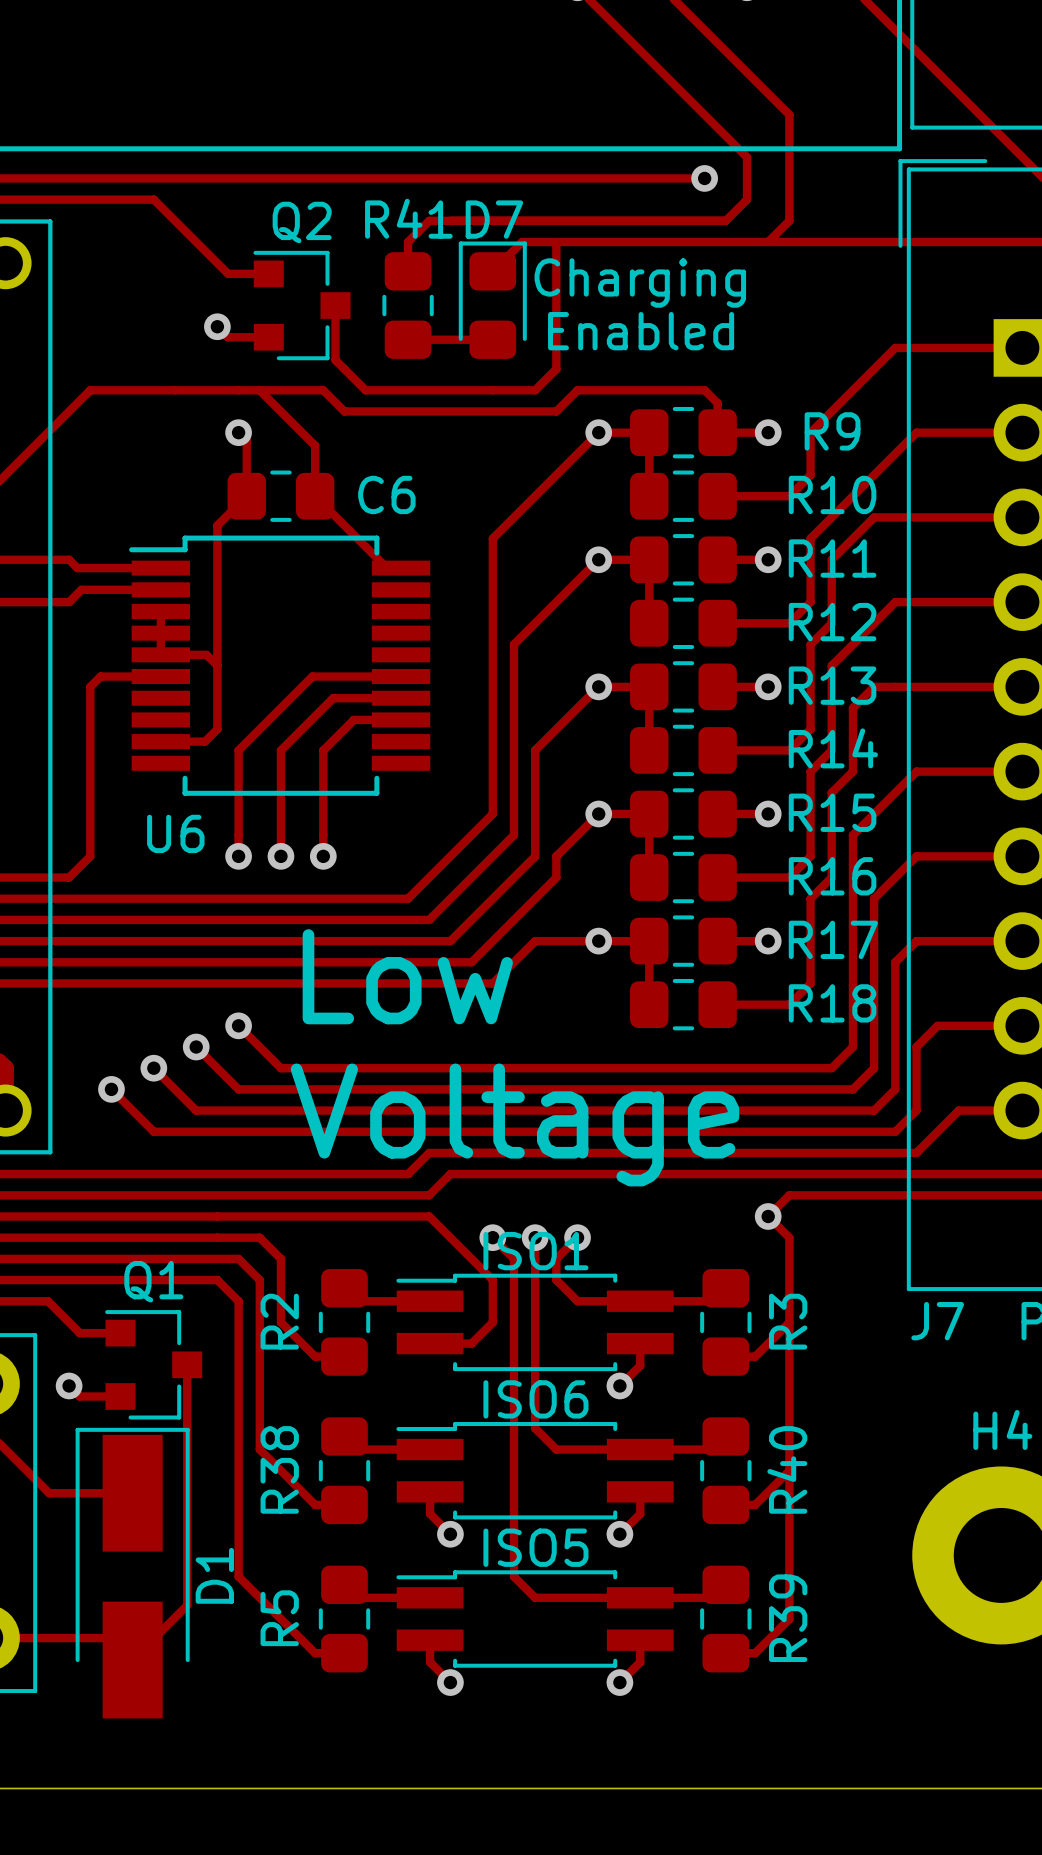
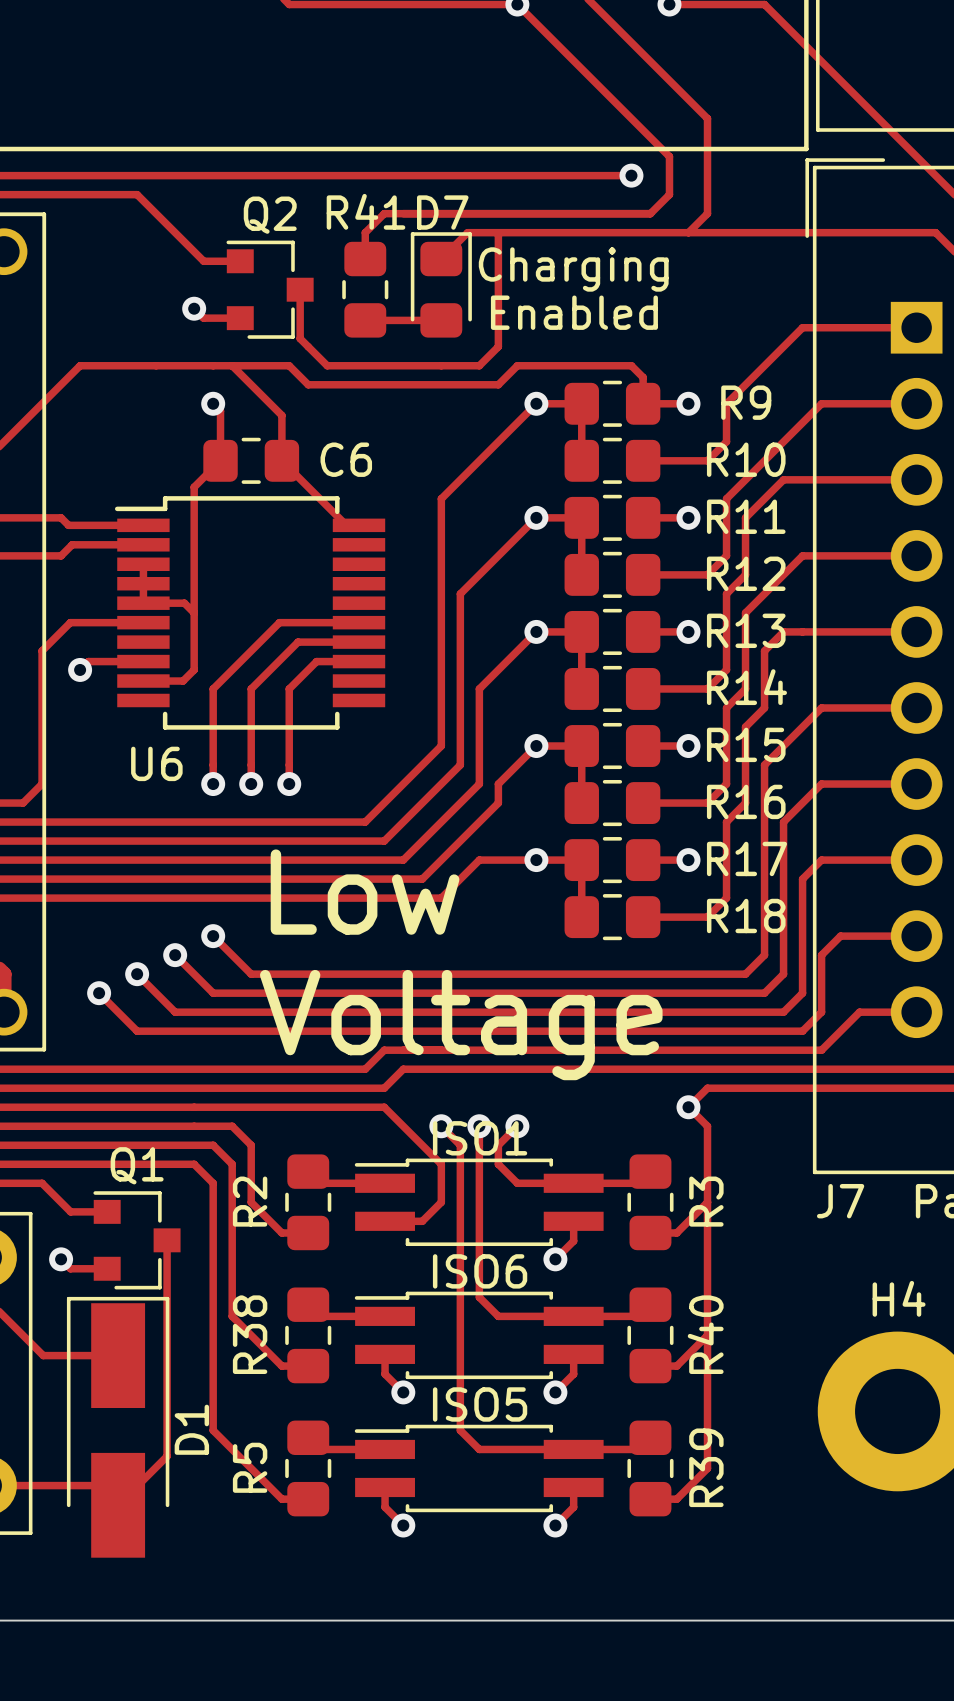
track: (100, 676) (90, 686) (90, 856) (69, 877) (26, 877) -> (89, 622) (70, 622) (42, 650) (42, 784) (23, 803)
track: none -> (143, 661) (88, 661) (80, 669)
via: none -> (80, 669)

